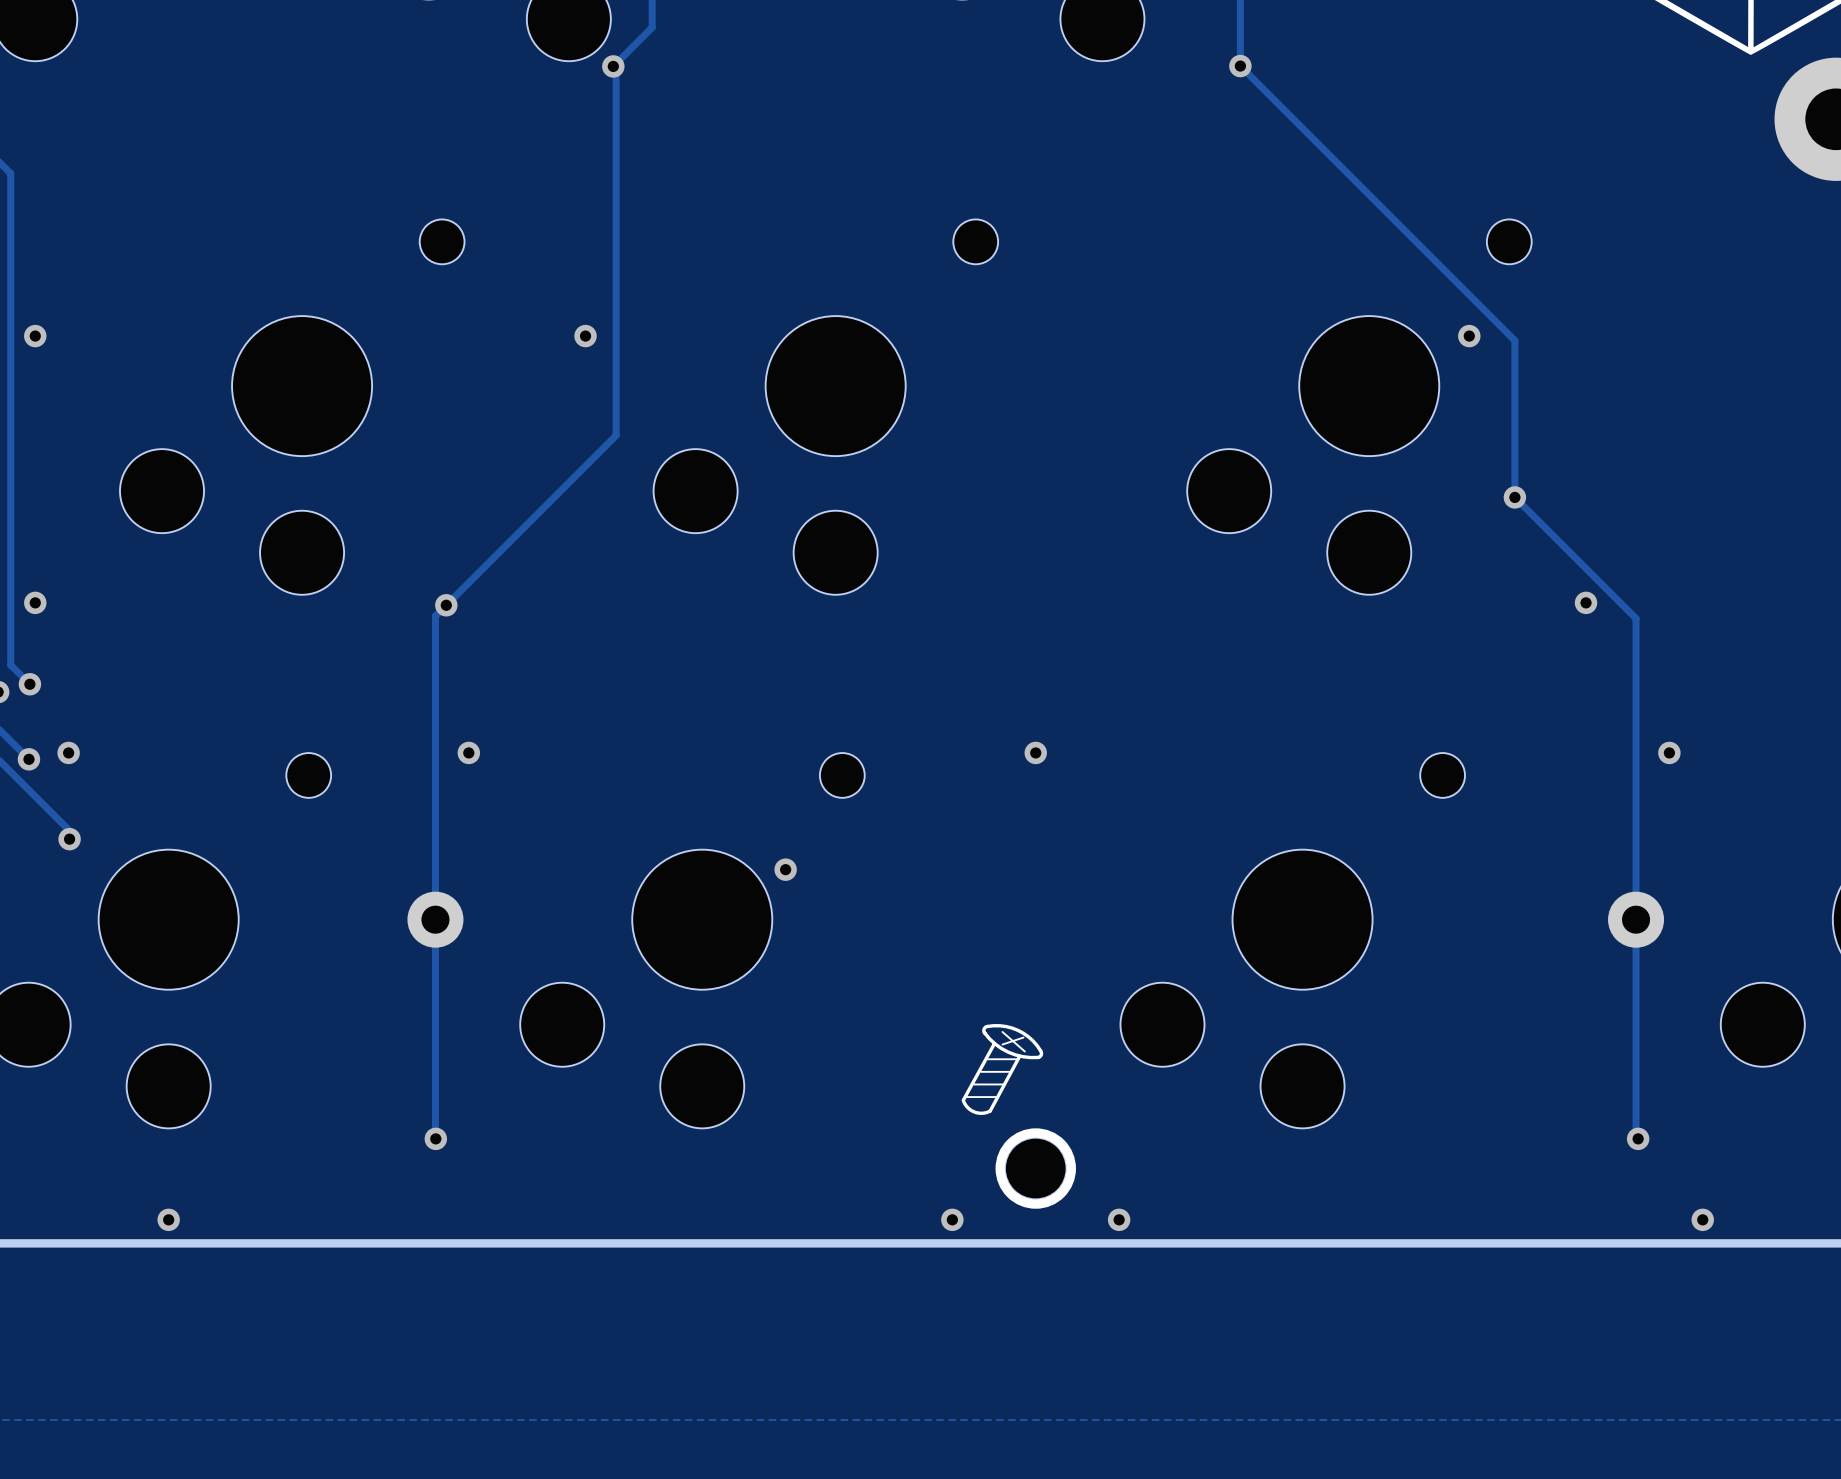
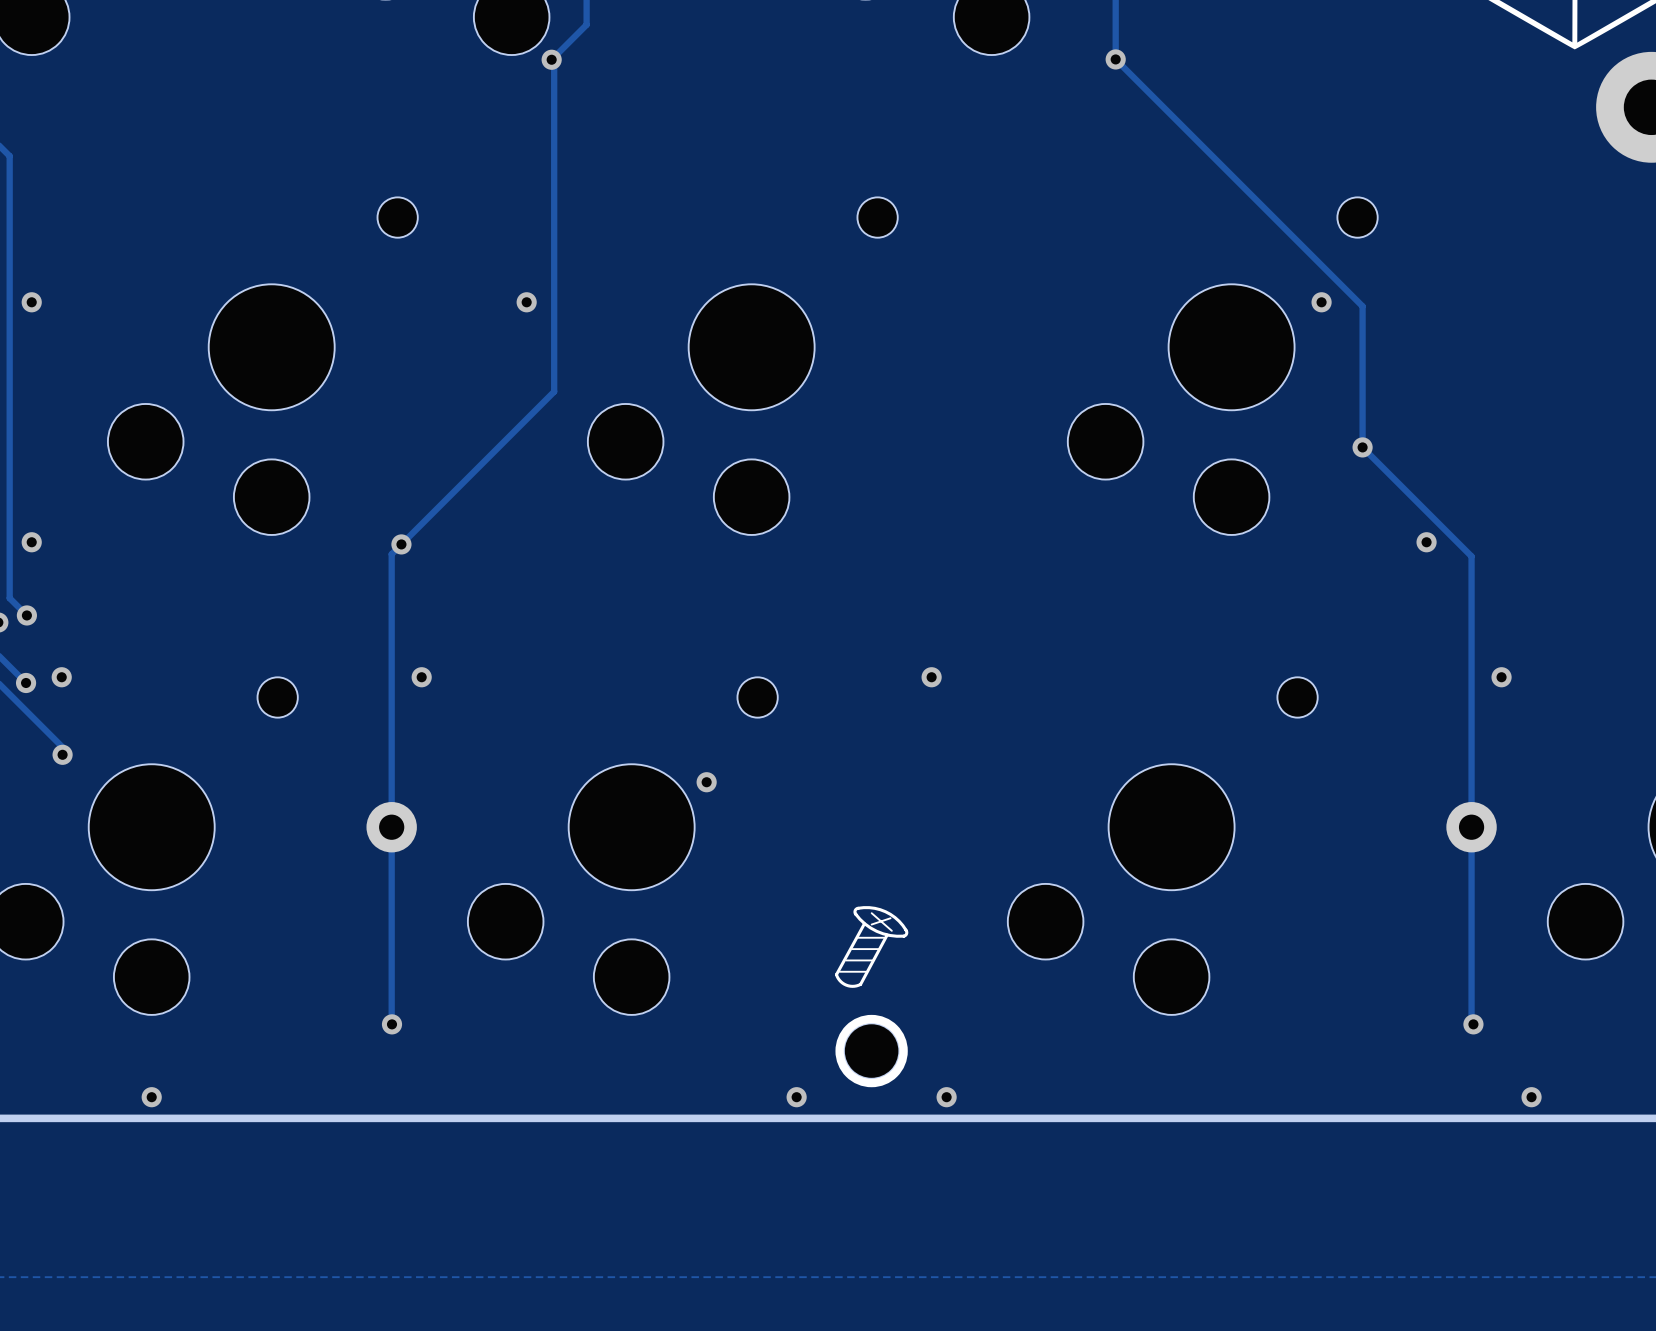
drawing position: (1002, 1069) -> (871, 946)
part position: (1035, 1168) -> (871, 1051)
via: none -> (796, 1097)
via: (952, 1219) -> none
via: none -> (946, 1097)
via: (1119, 1219) -> none

